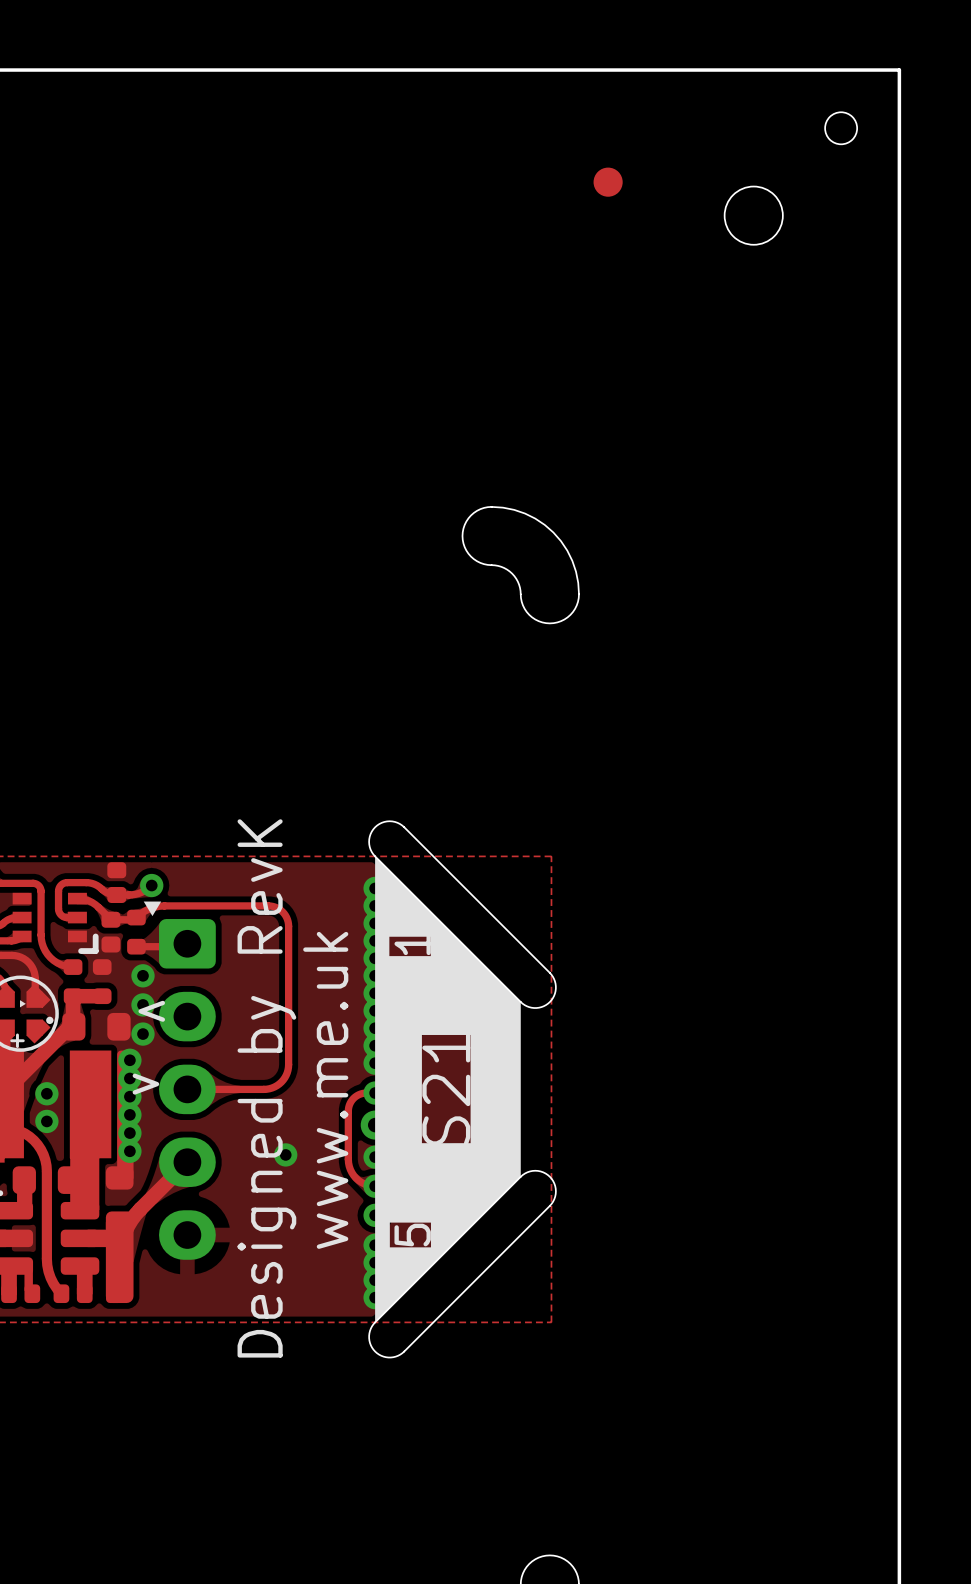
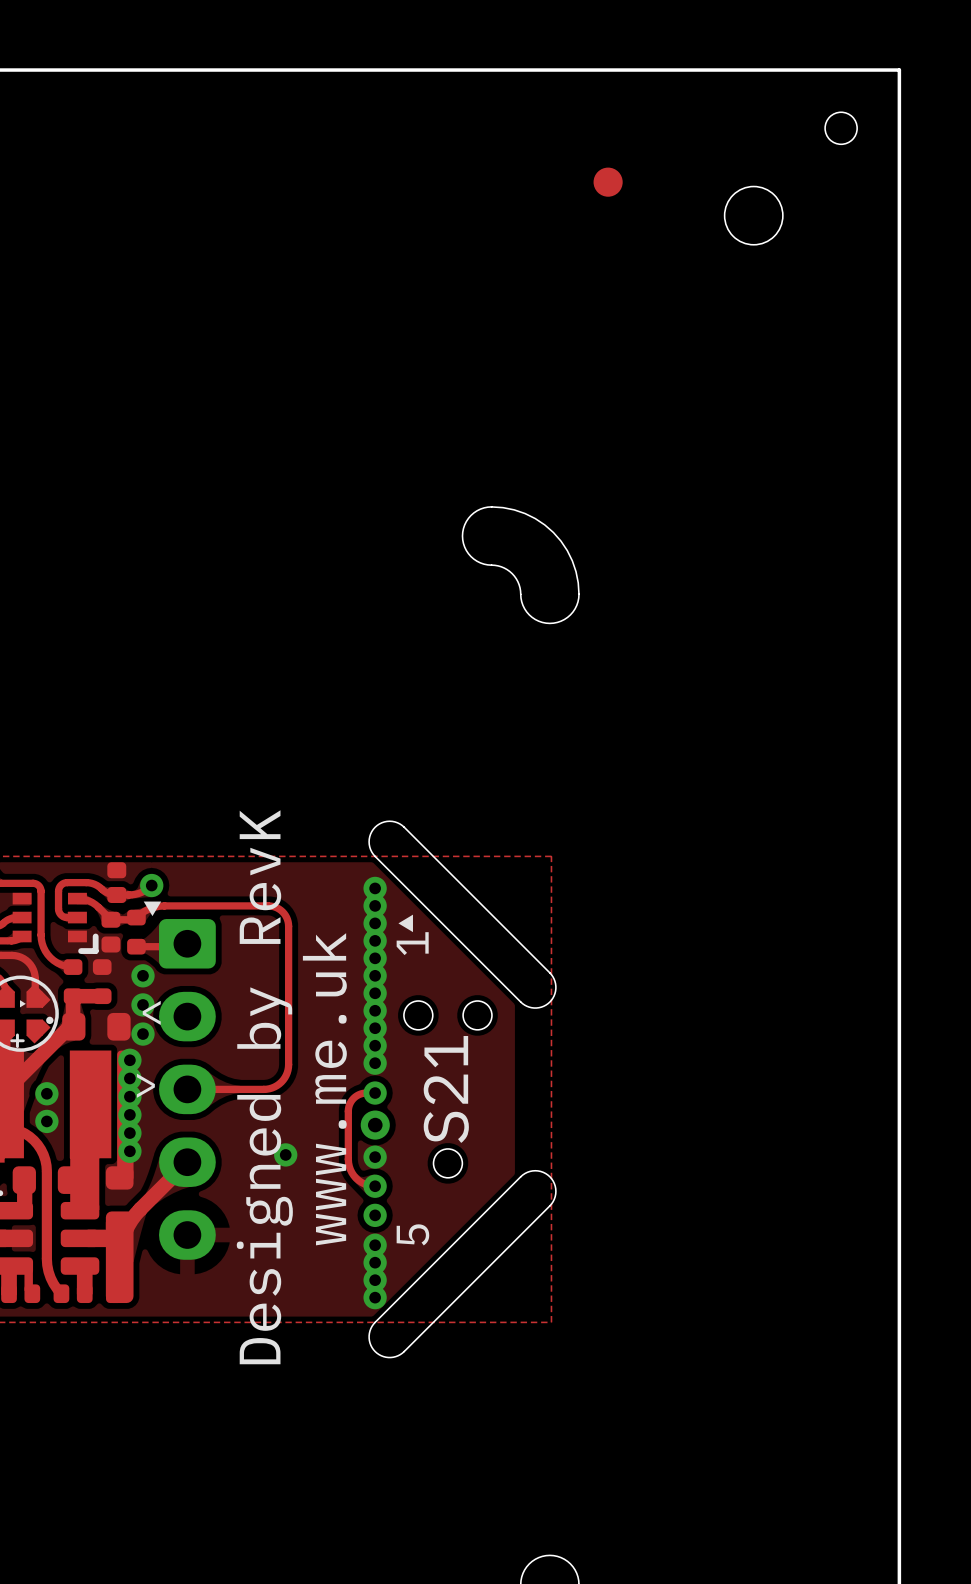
drawing: [375, 856, 521, 1323] -> none
drawing: none -> [398, 914, 413, 933]

